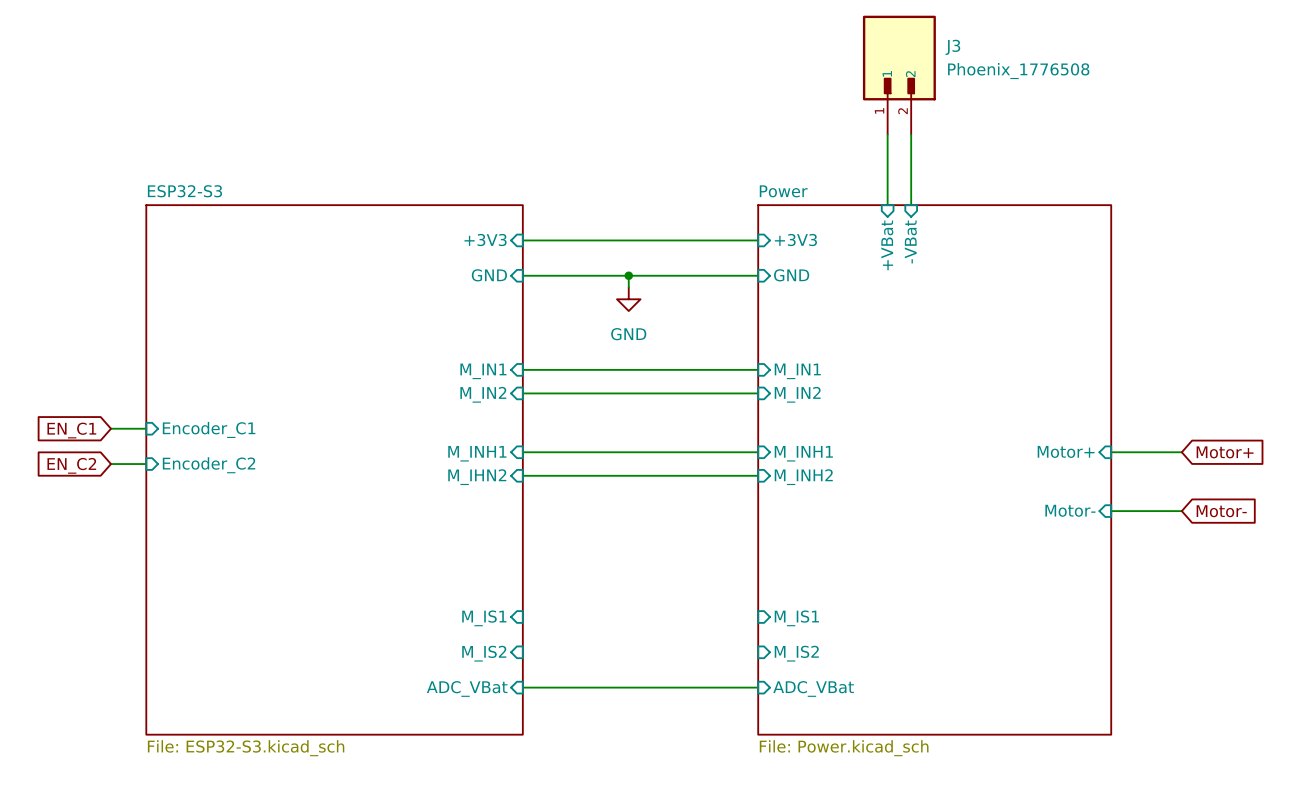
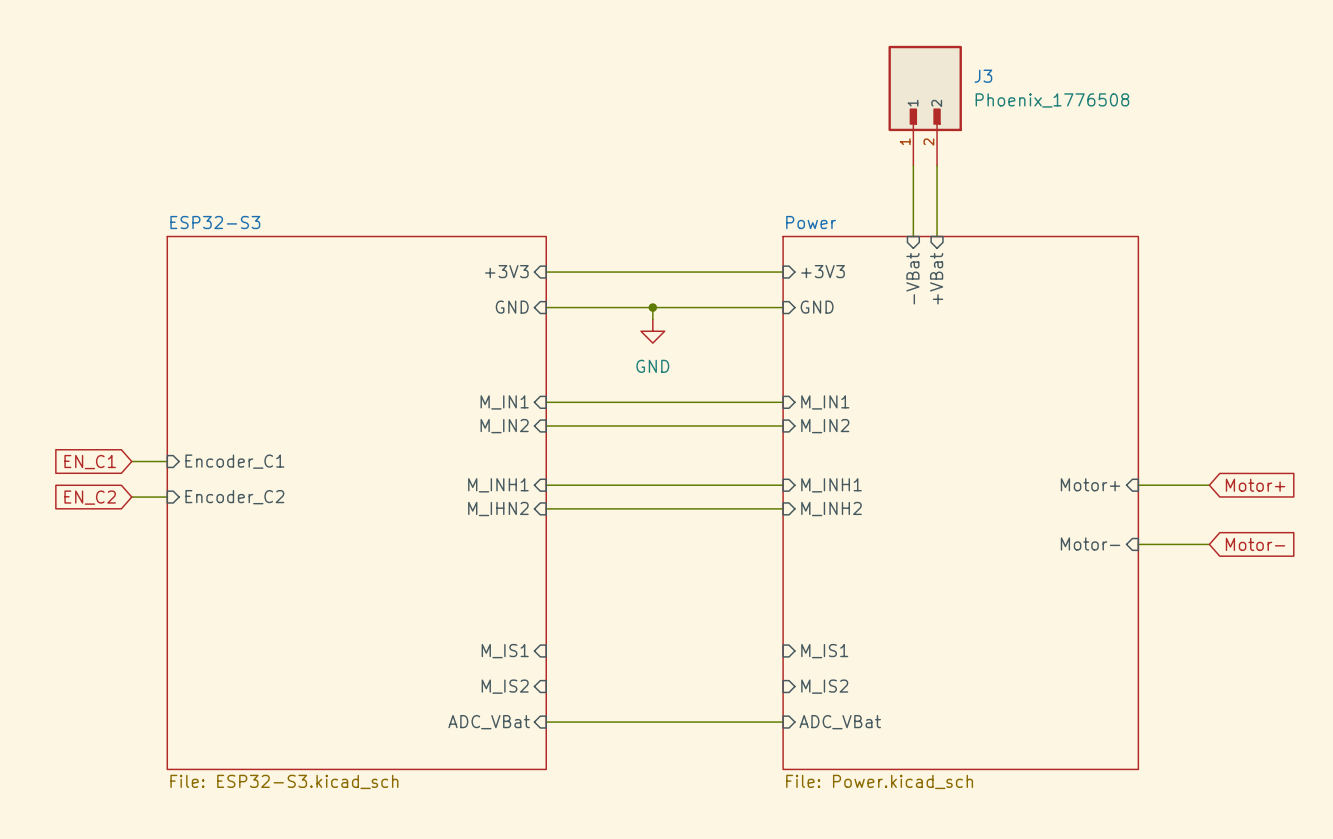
sheet pin: -VBat (910, 241) -> +VBat (936, 278)
sheet pin: +VBat (887, 245) -> -VBat (912, 278)

